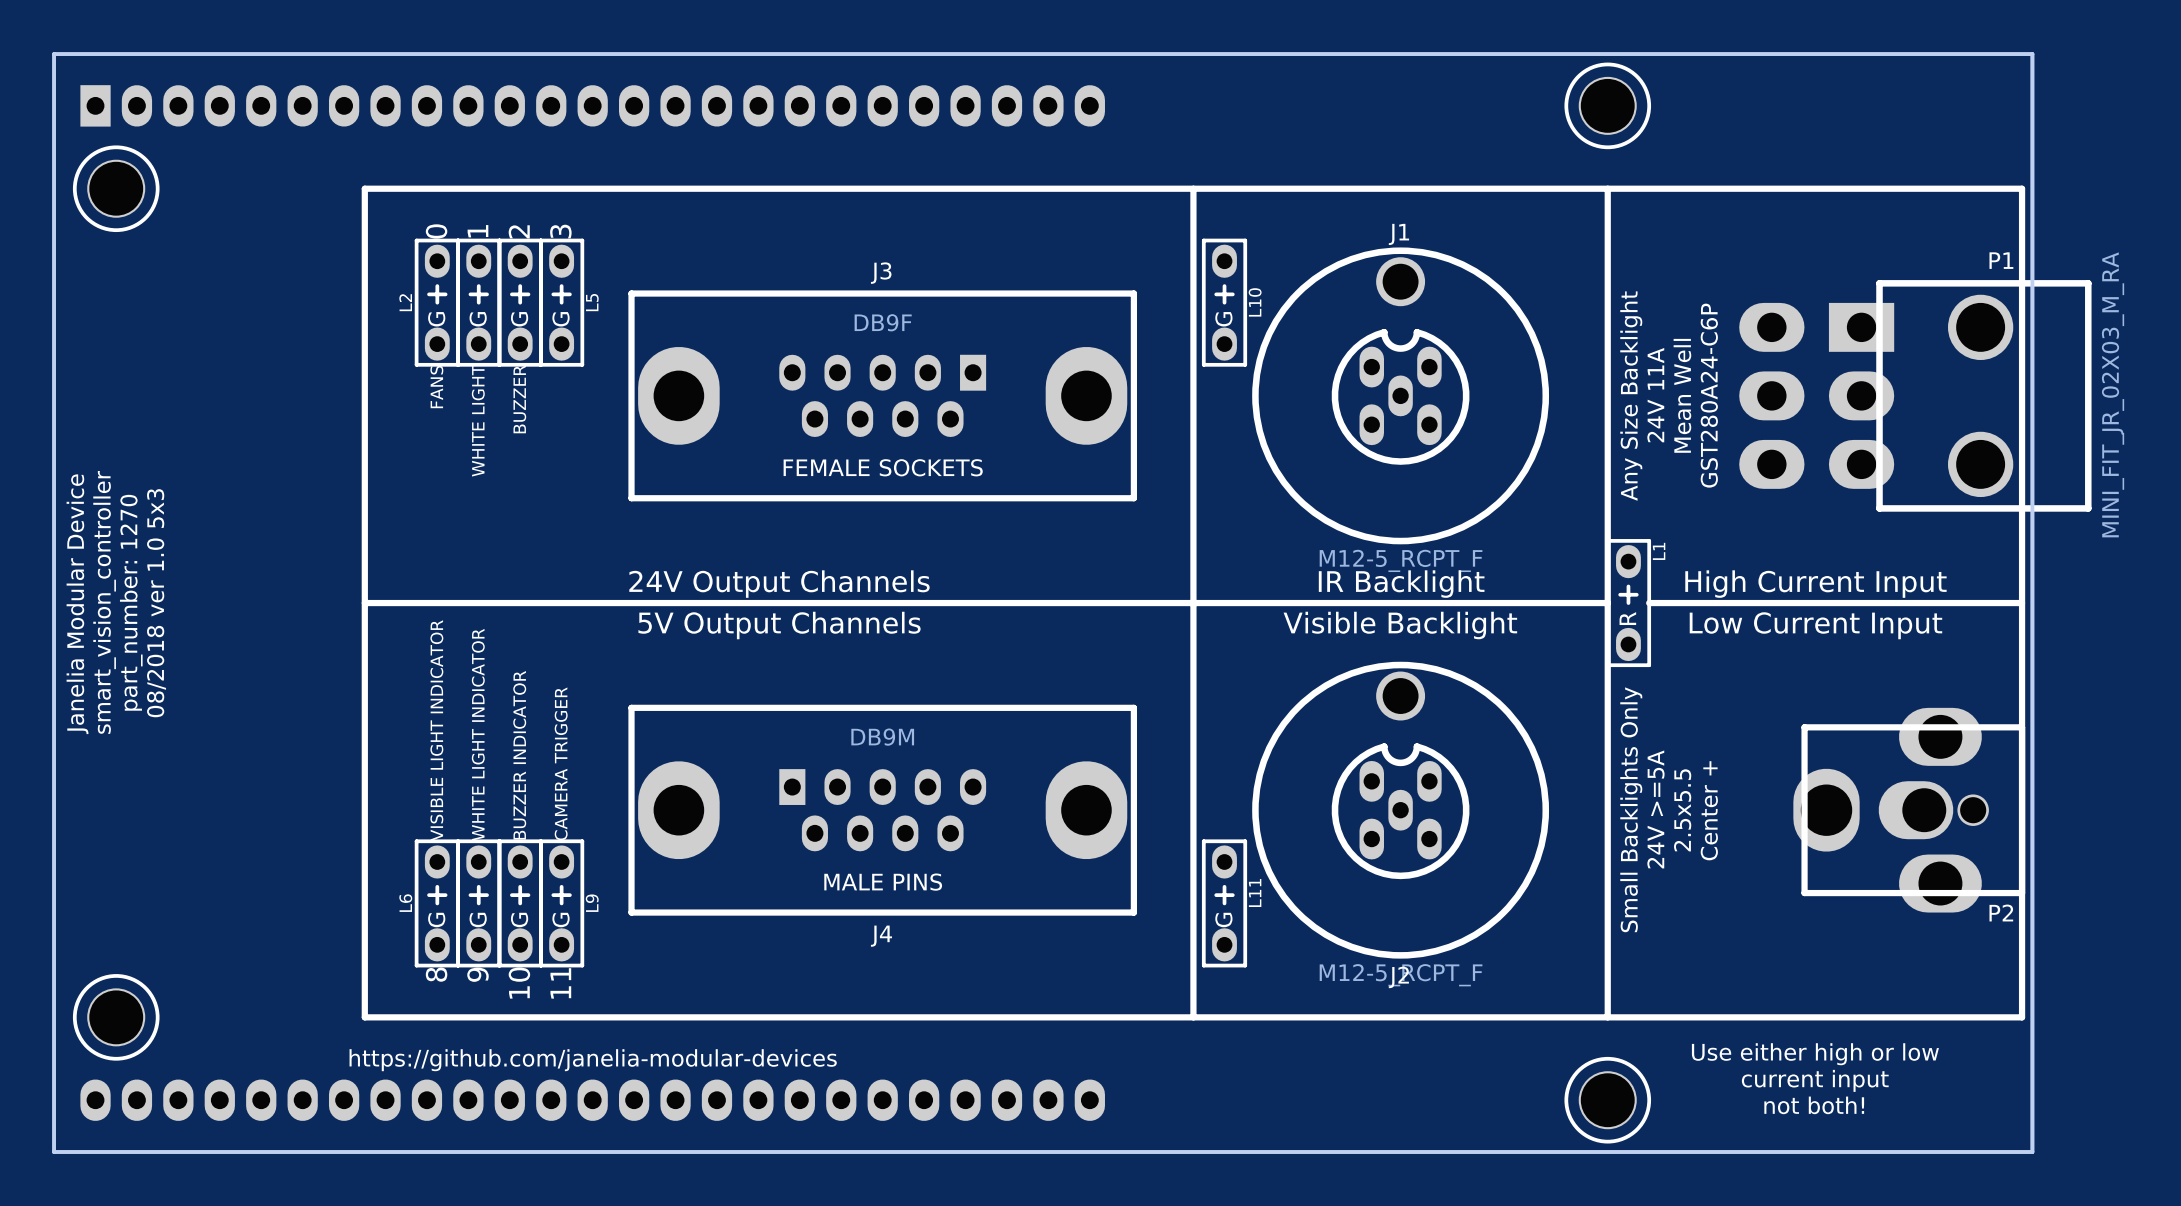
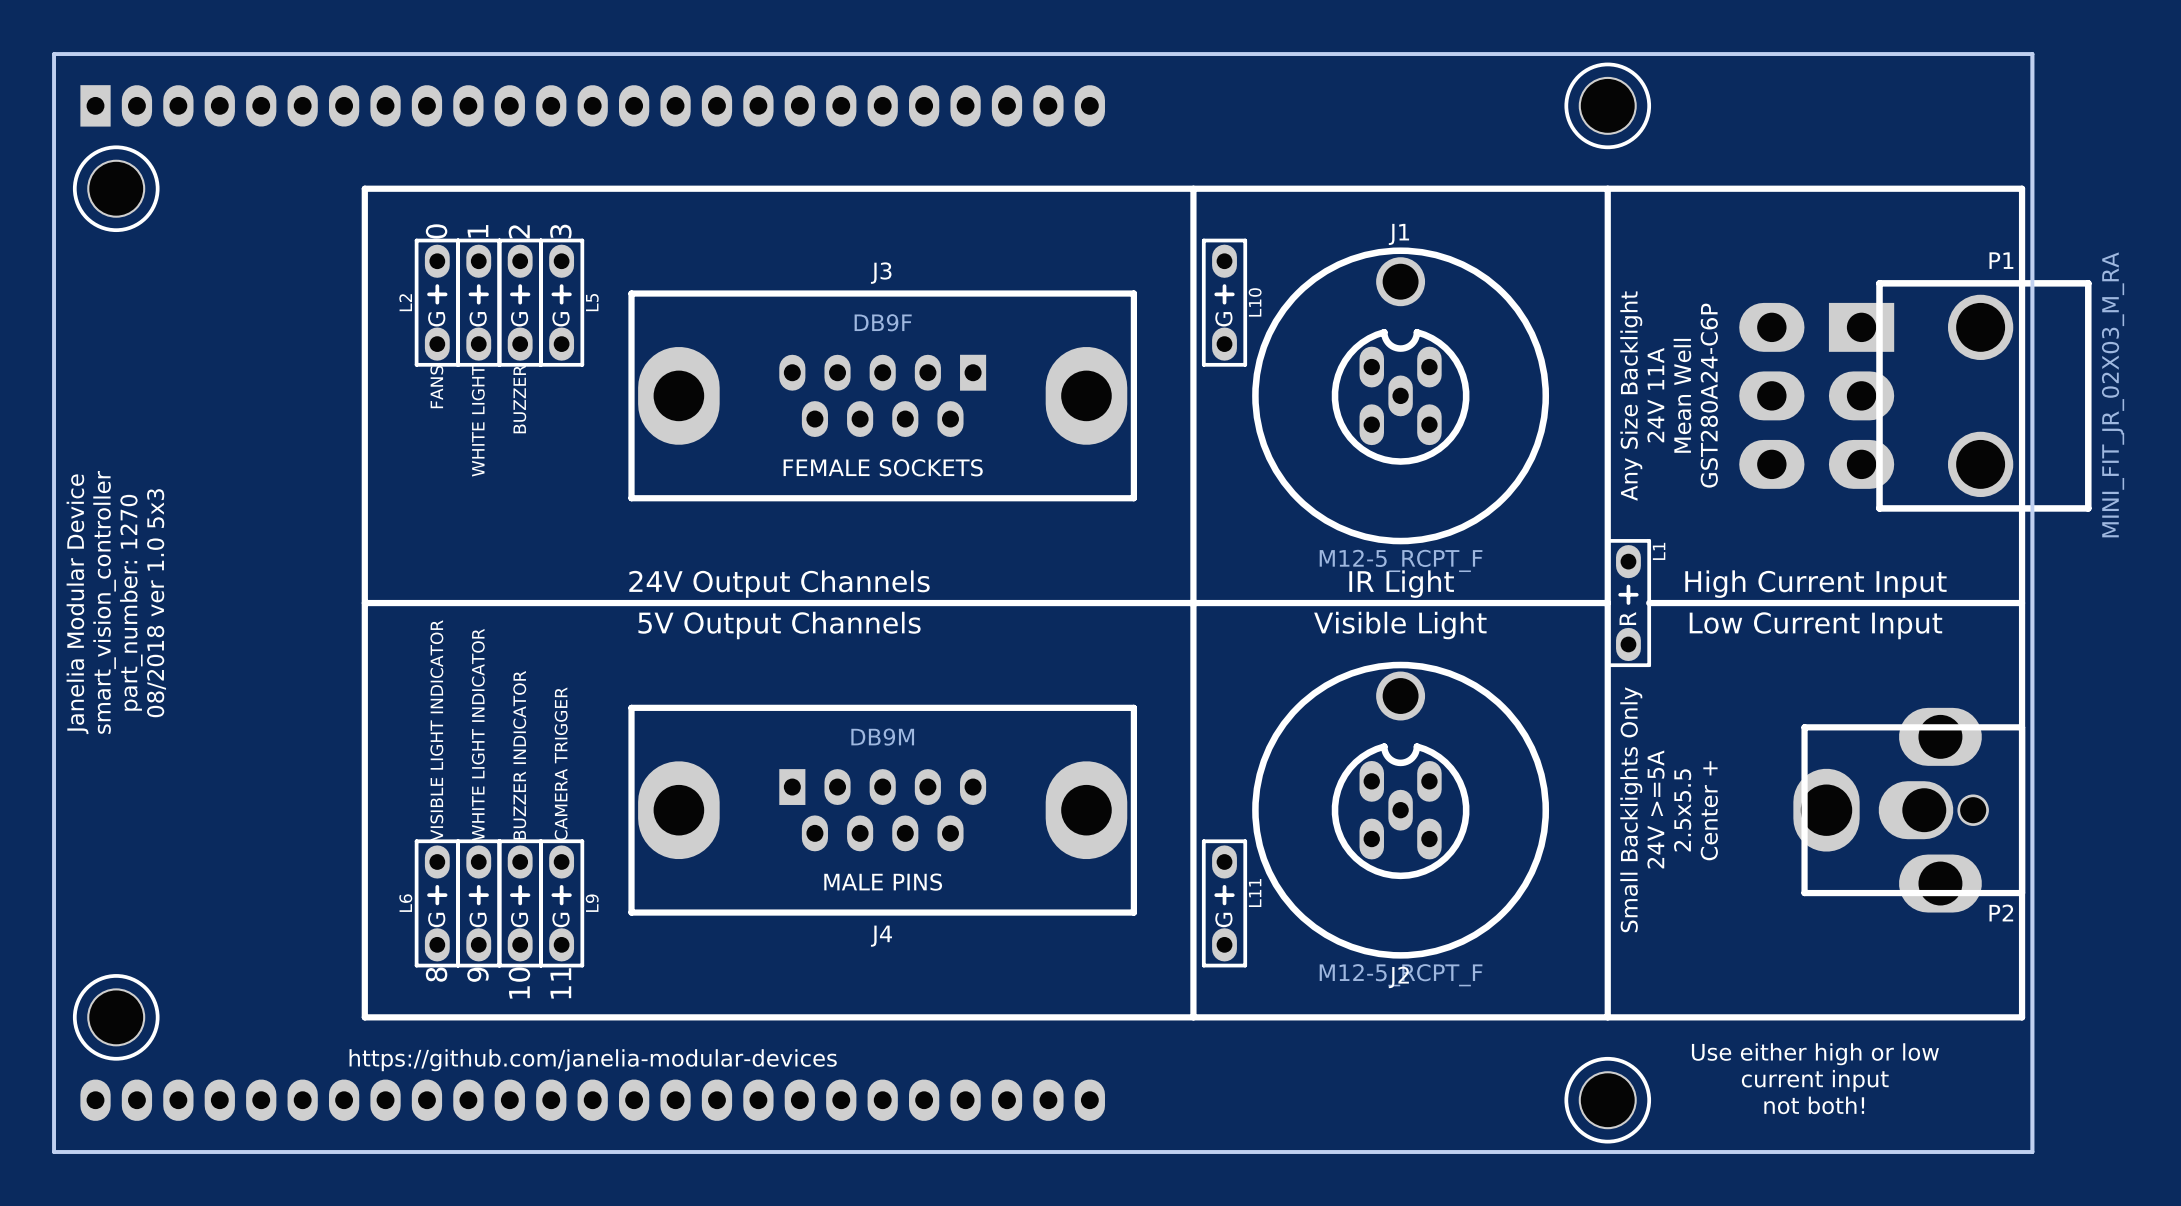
text: IR Backlight (1401, 584) -> IR Light (1401, 584)
text: Visible Backlight (1400, 625) -> Visible Light (1400, 625)

